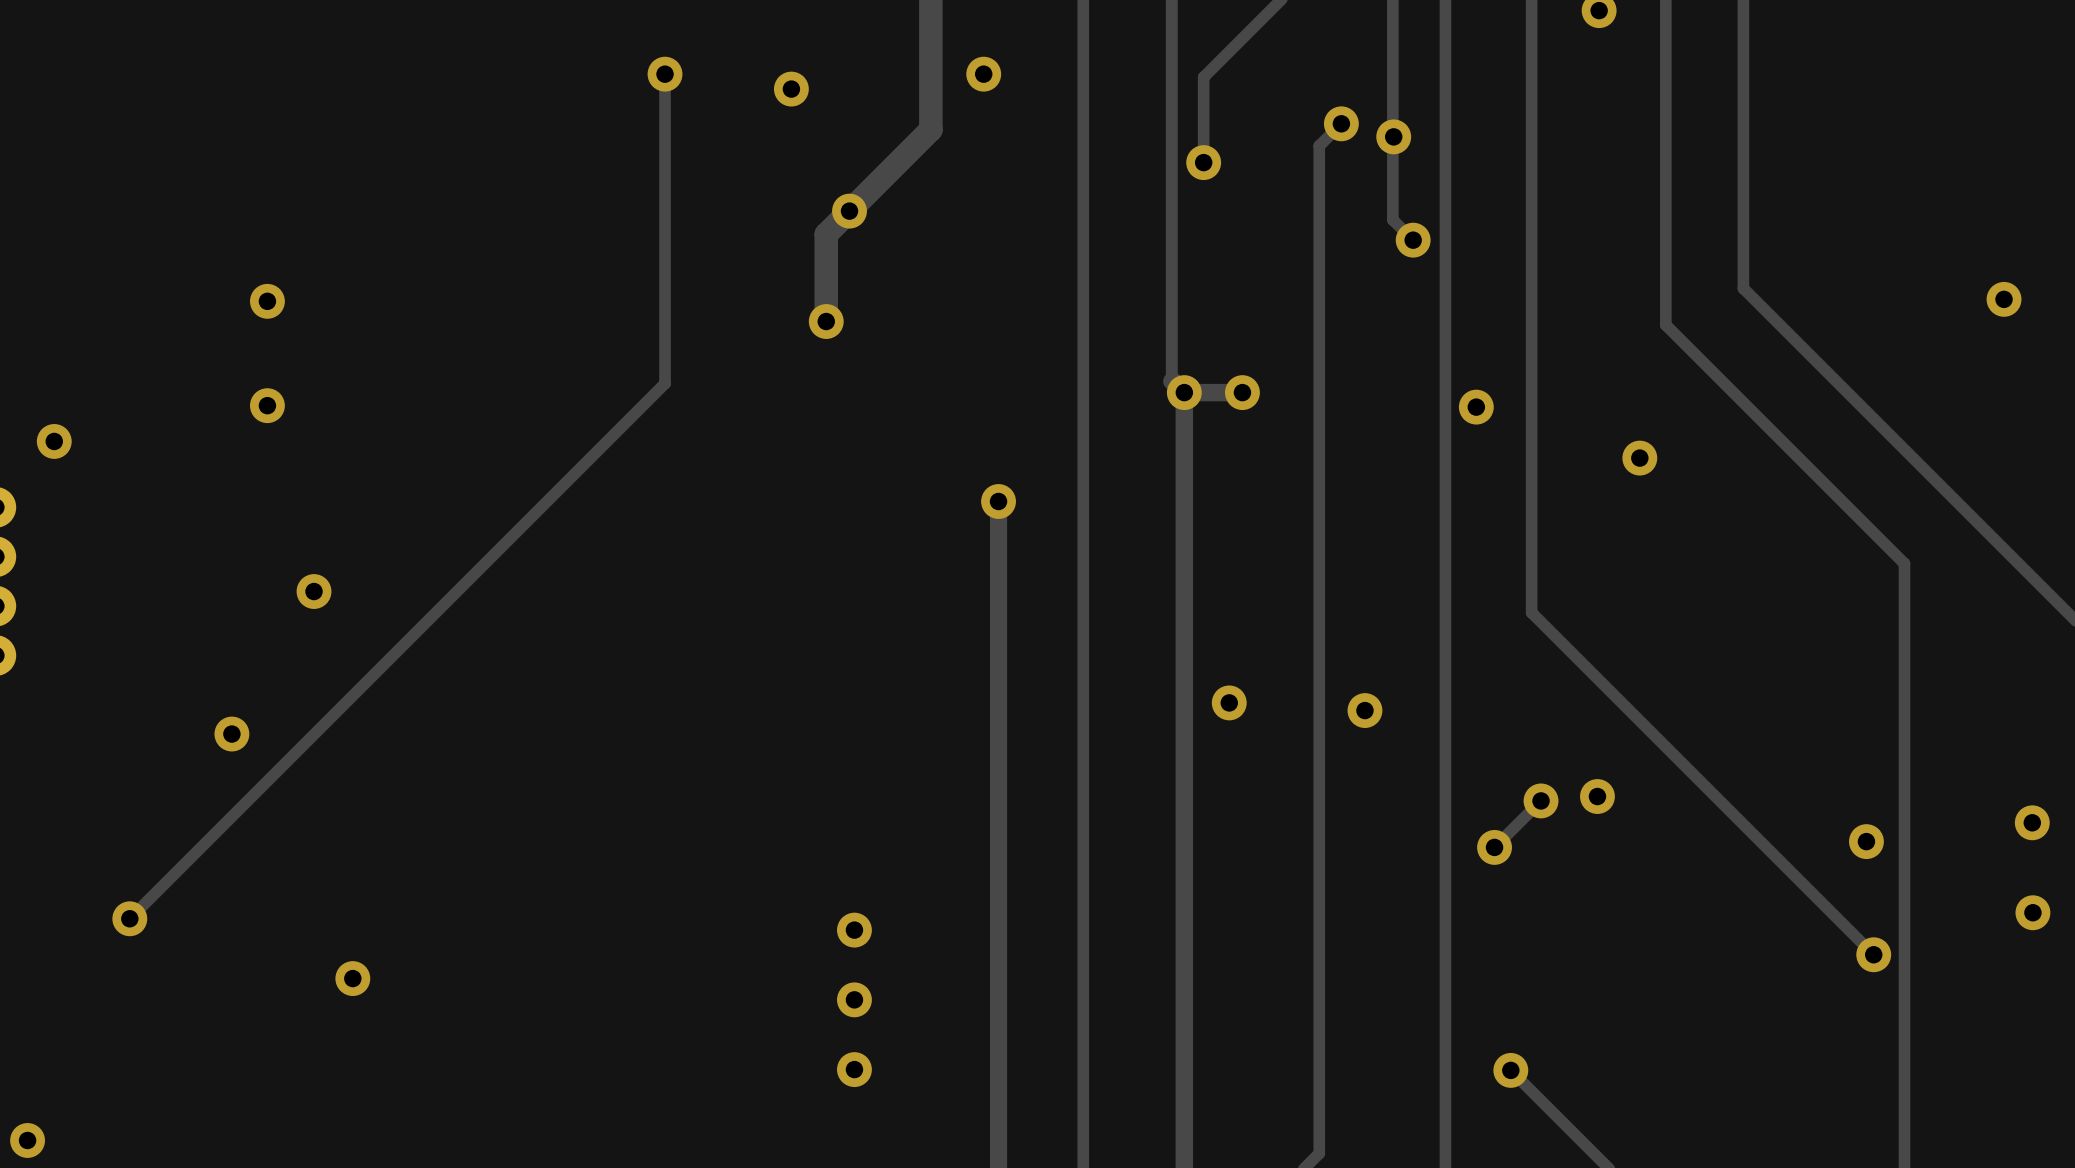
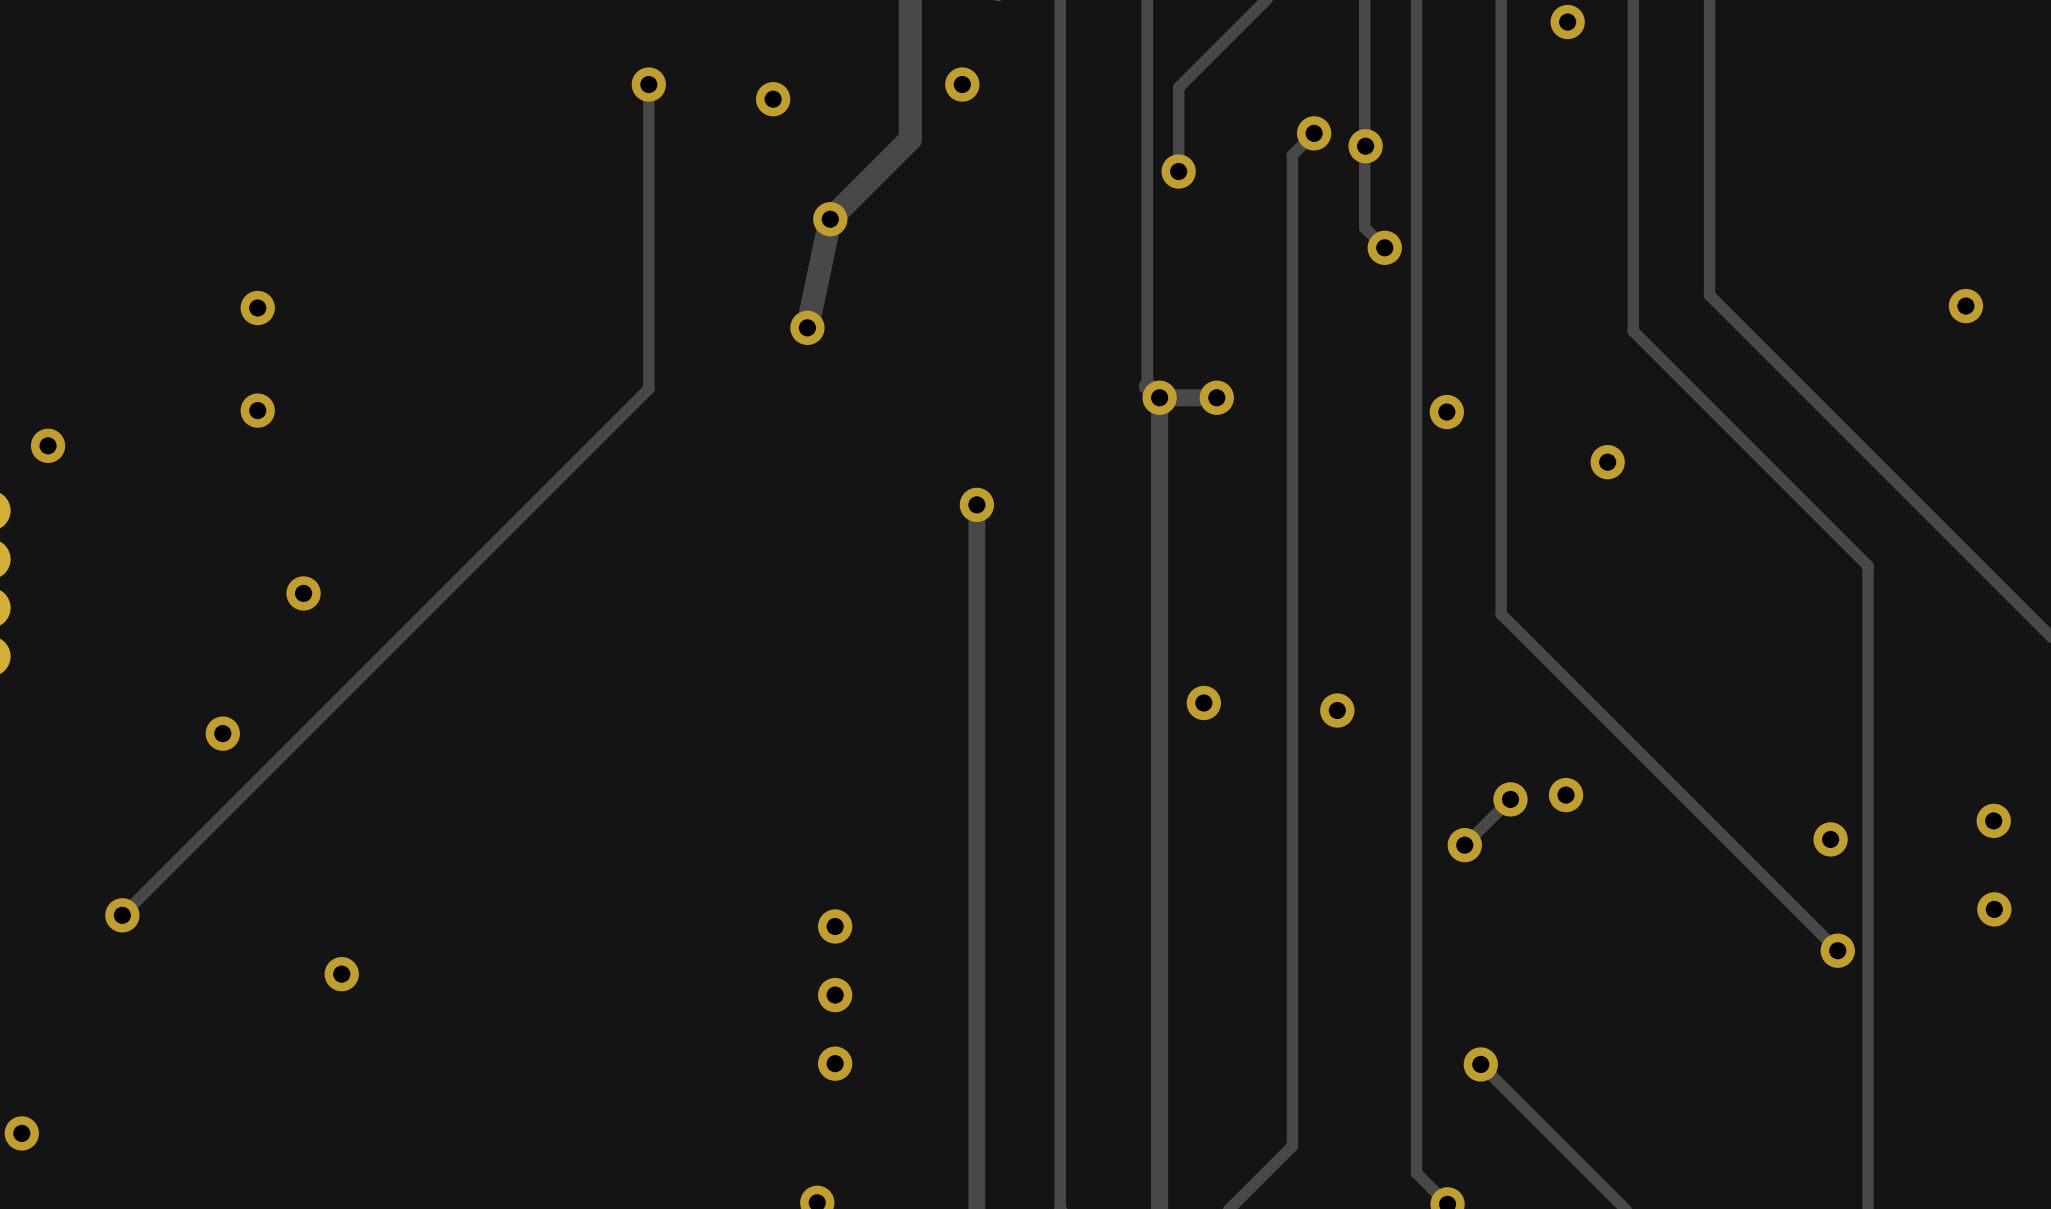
track: (849, 211) (826, 234) (826, 321) -> (830, 219) (807, 327)

